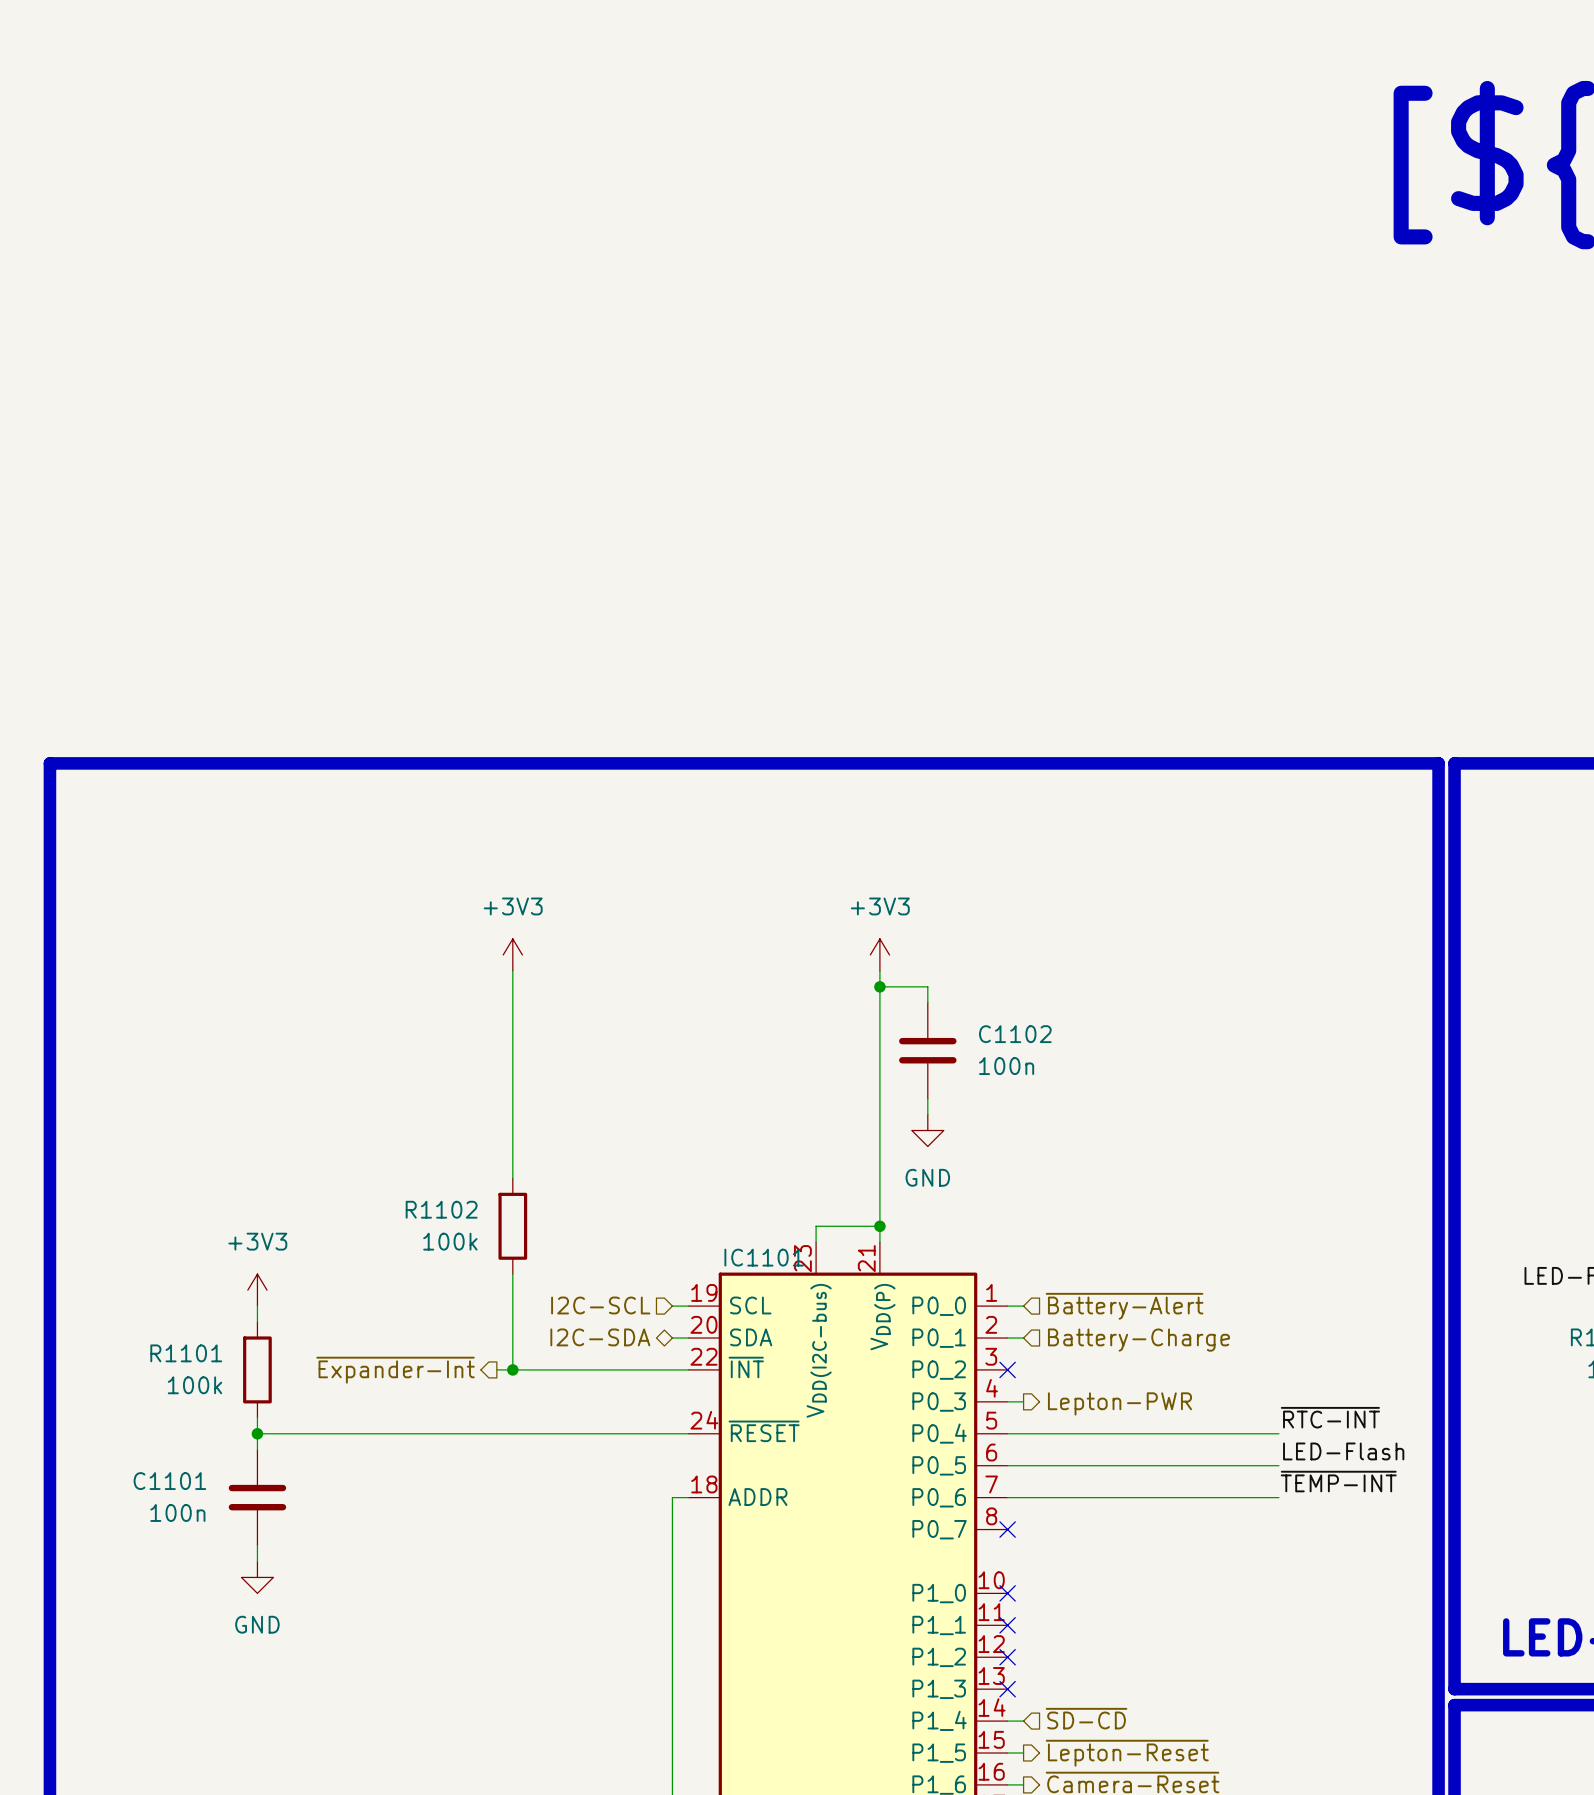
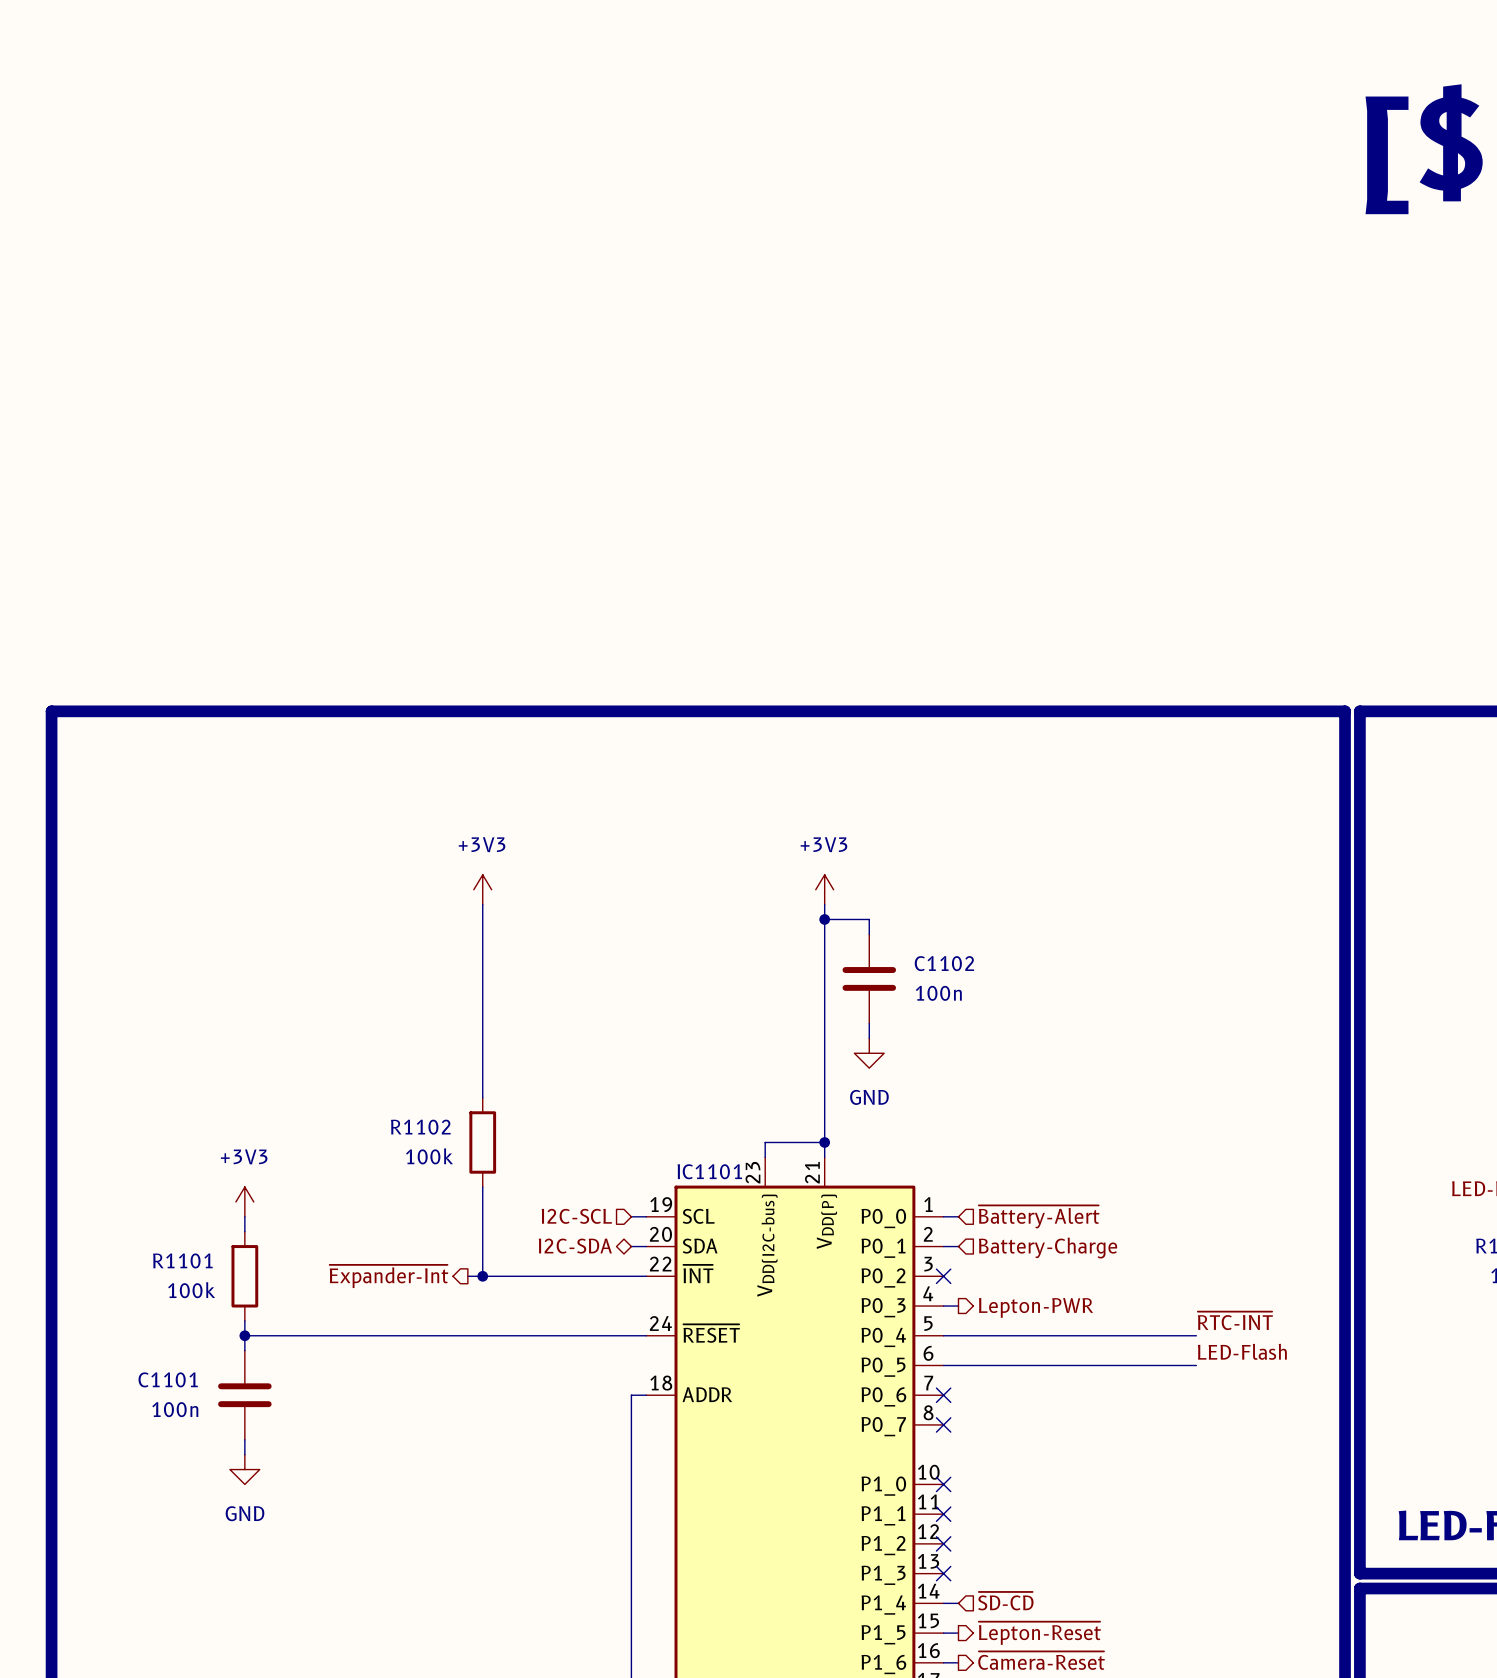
label: ~{TEMP-INT} (1338, 1481) -> none
wire: (1007, 1497) (1278, 1497) -> none
no-connect mark: none -> (943, 1395)

